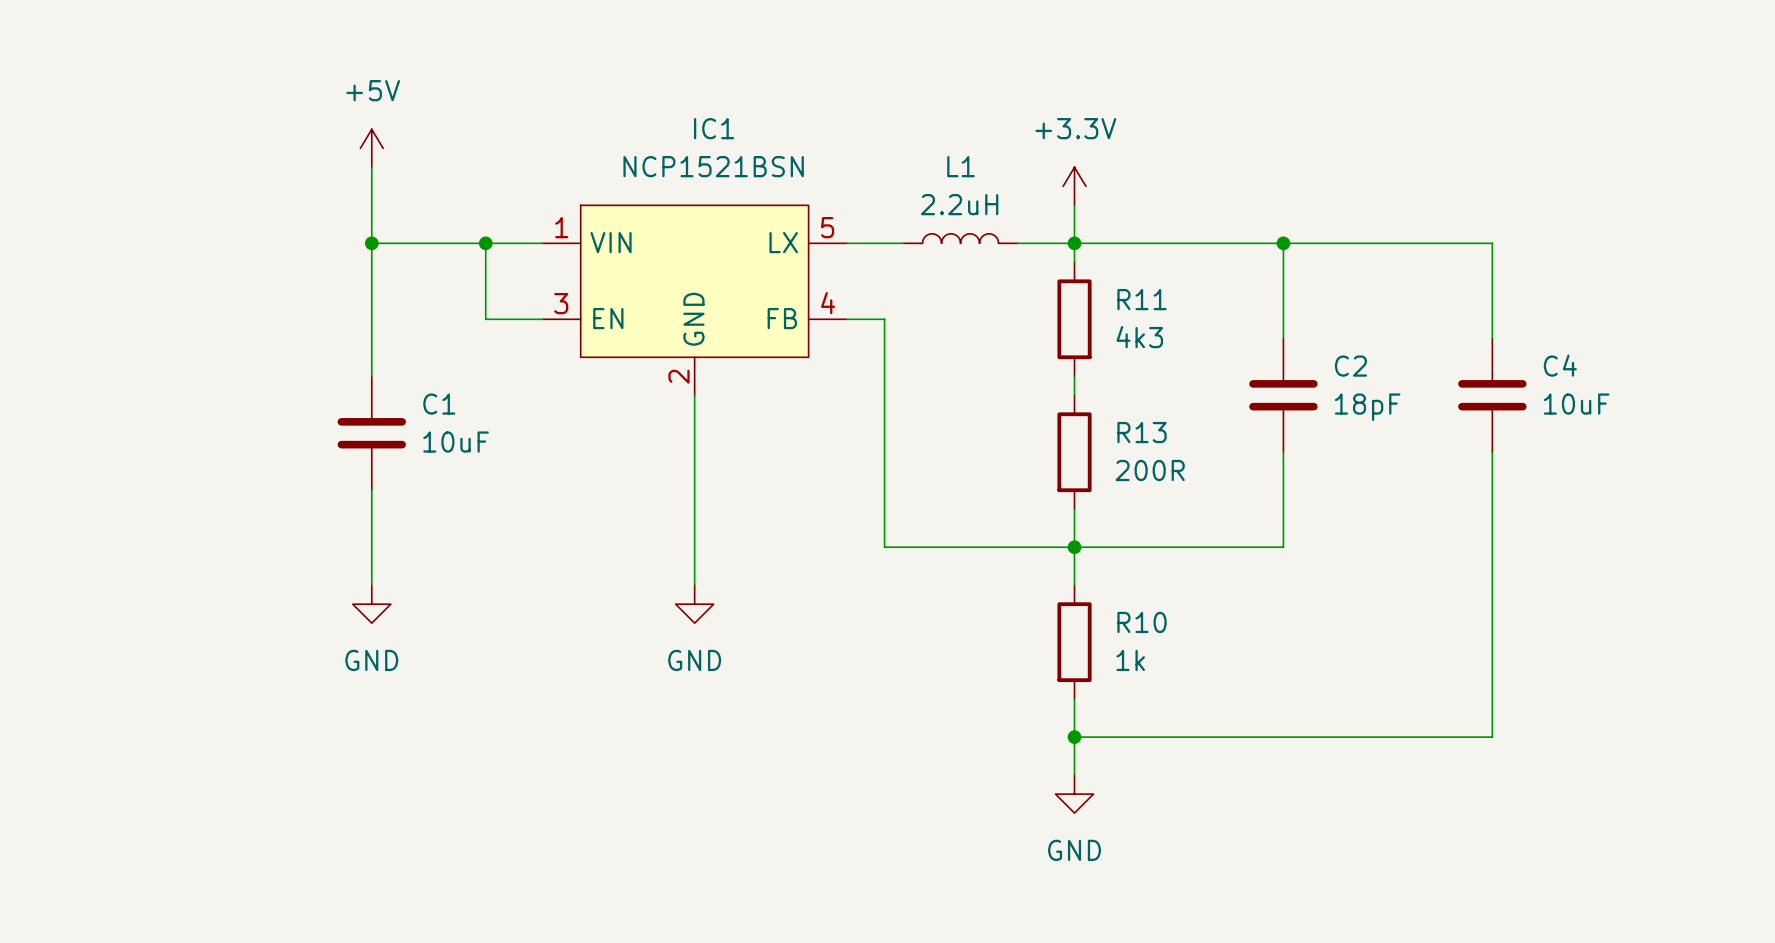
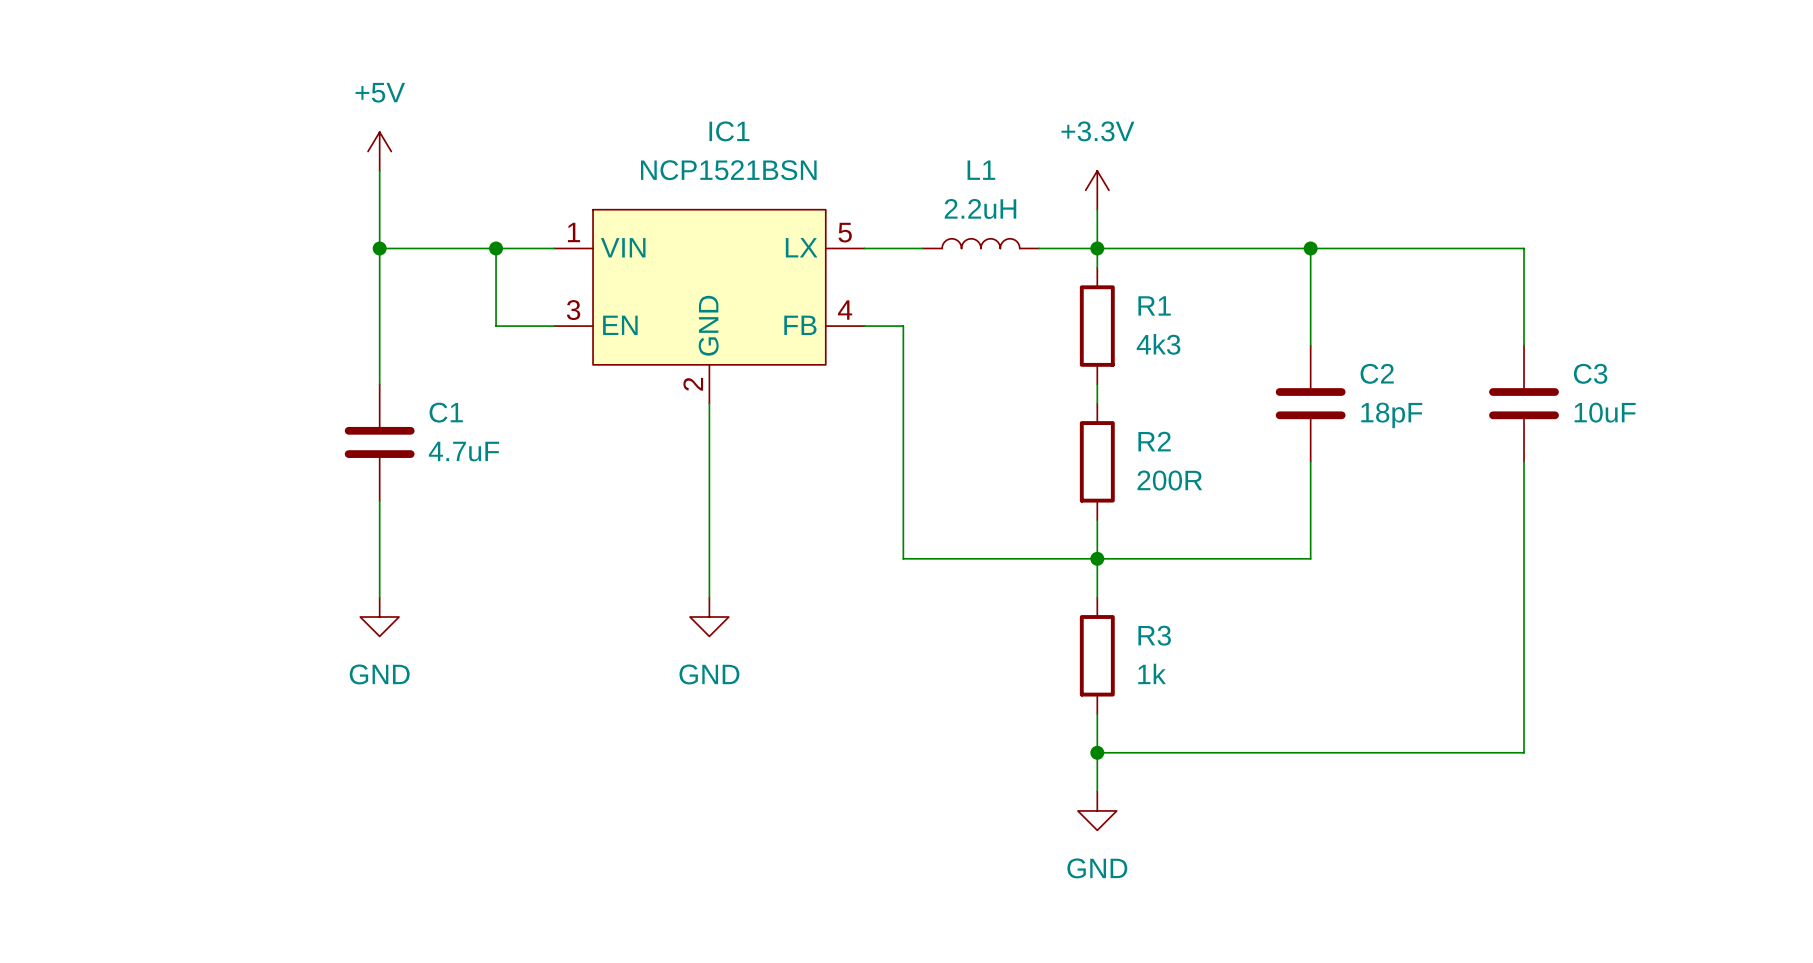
R11 name: R11 (1142, 299) -> R1 (1154, 305)
C4 name: C4 (1560, 365) -> C3 (1590, 373)
R13 name: R13 (1142, 432) -> R2 (1154, 441)
C1 value: 10uF (456, 442) -> 4.7uF (463, 451)
R10 name: R10 (1142, 622) -> R3 (1154, 635)

